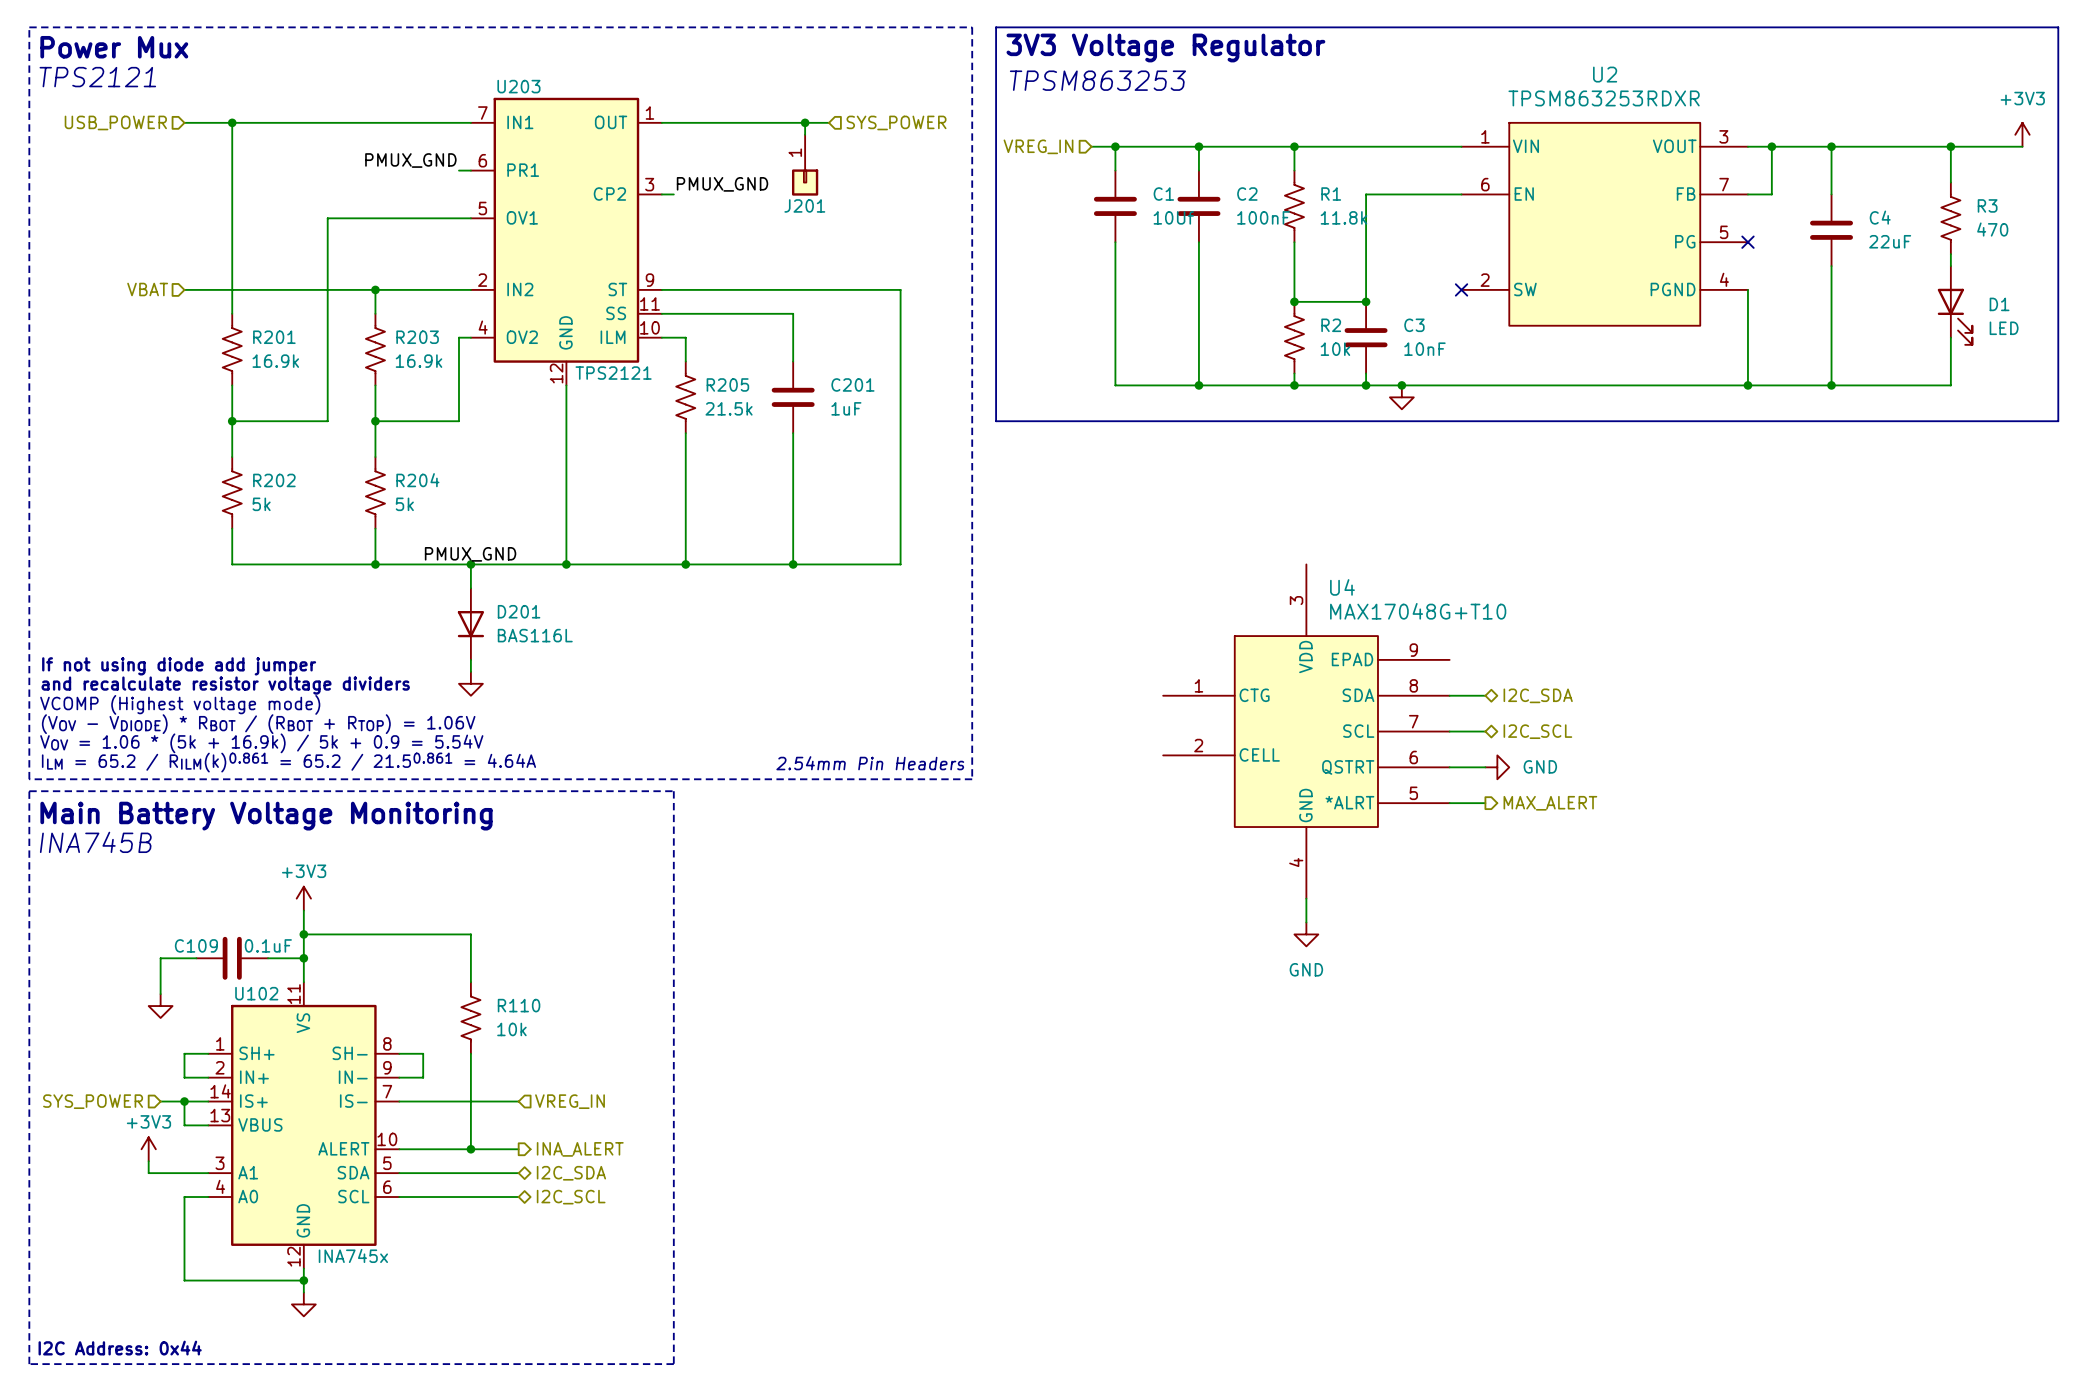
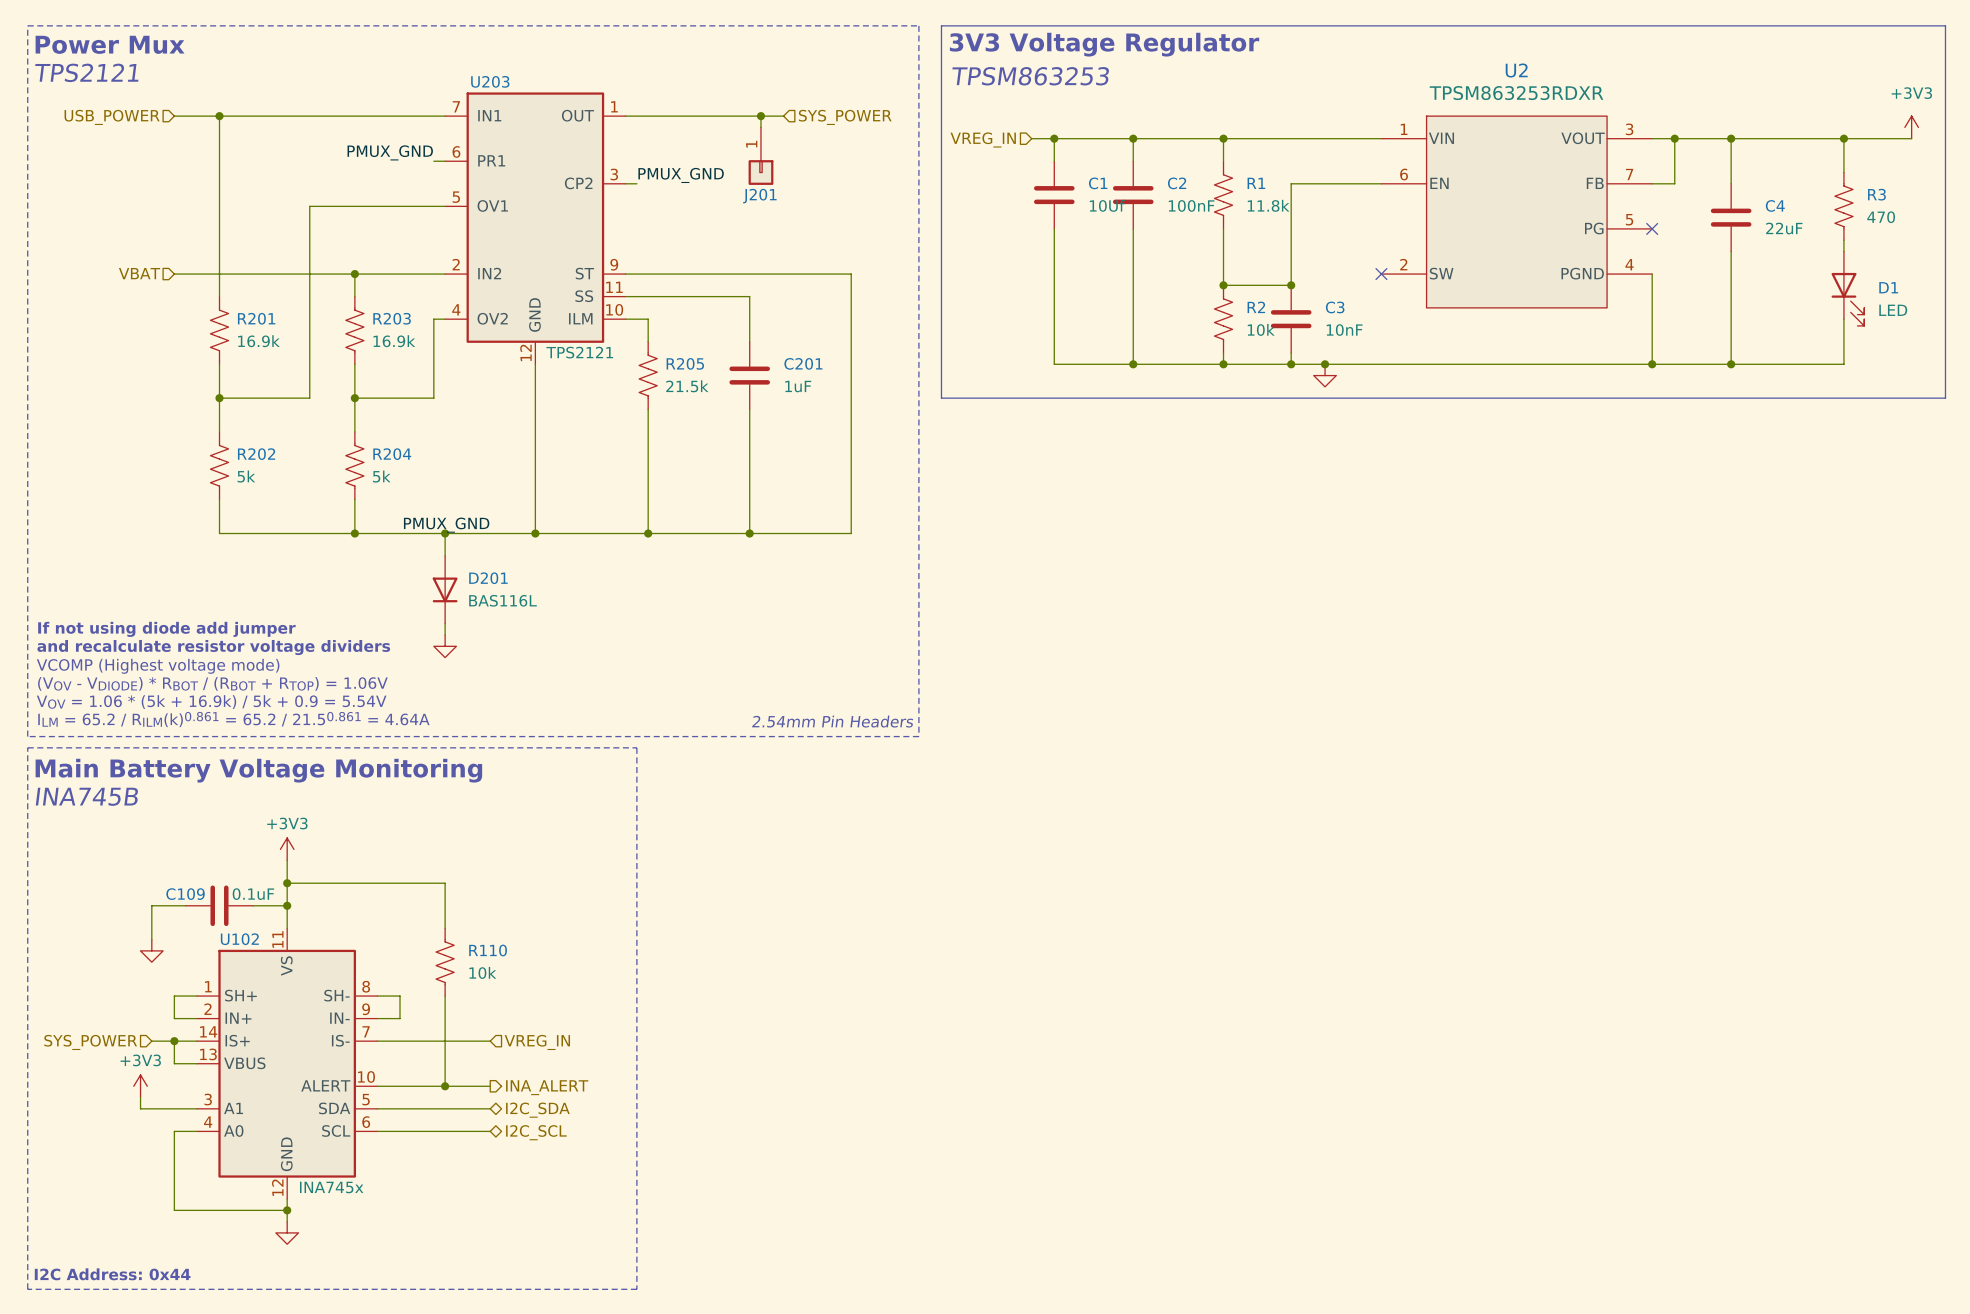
wire: (1449, 695) (1485, 695) -> none
hierarchical label: I2C_SDA (1538, 695) -> none
U4: MAX17048G+T10 (1306, 731) -> none
wire: (1449, 731) (1485, 731) -> none
hierarchical label: I2C_SCL (1537, 731) -> none
wire: (1449, 767) (1485, 767) -> none
power symbol: GND (1497, 767) -> none
wire: (1449, 803) (1485, 803) -> none
hierarchical label: MAX_ALERT (1550, 803) -> none
wire: (1306, 898) (1306, 922) -> none
power symbol: GND (1306, 934) -> none

